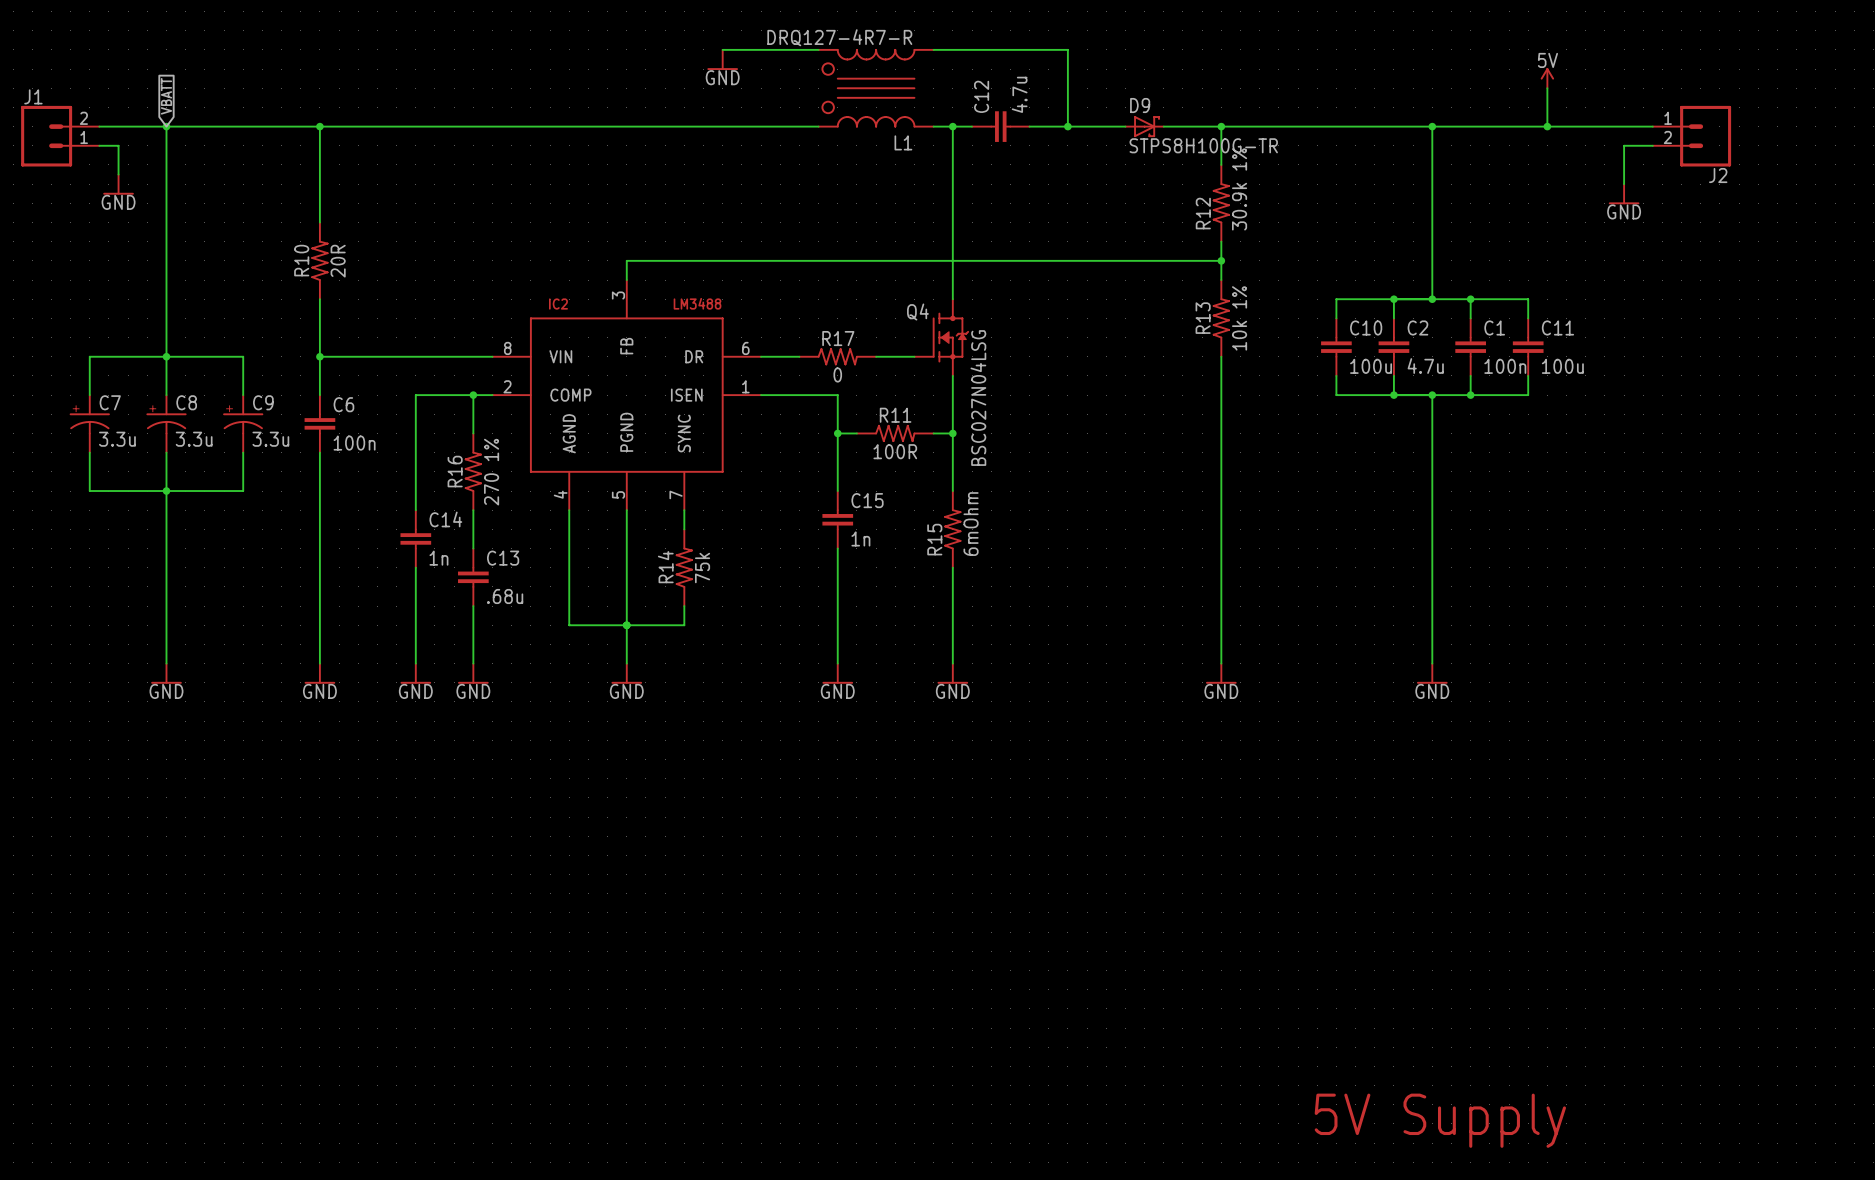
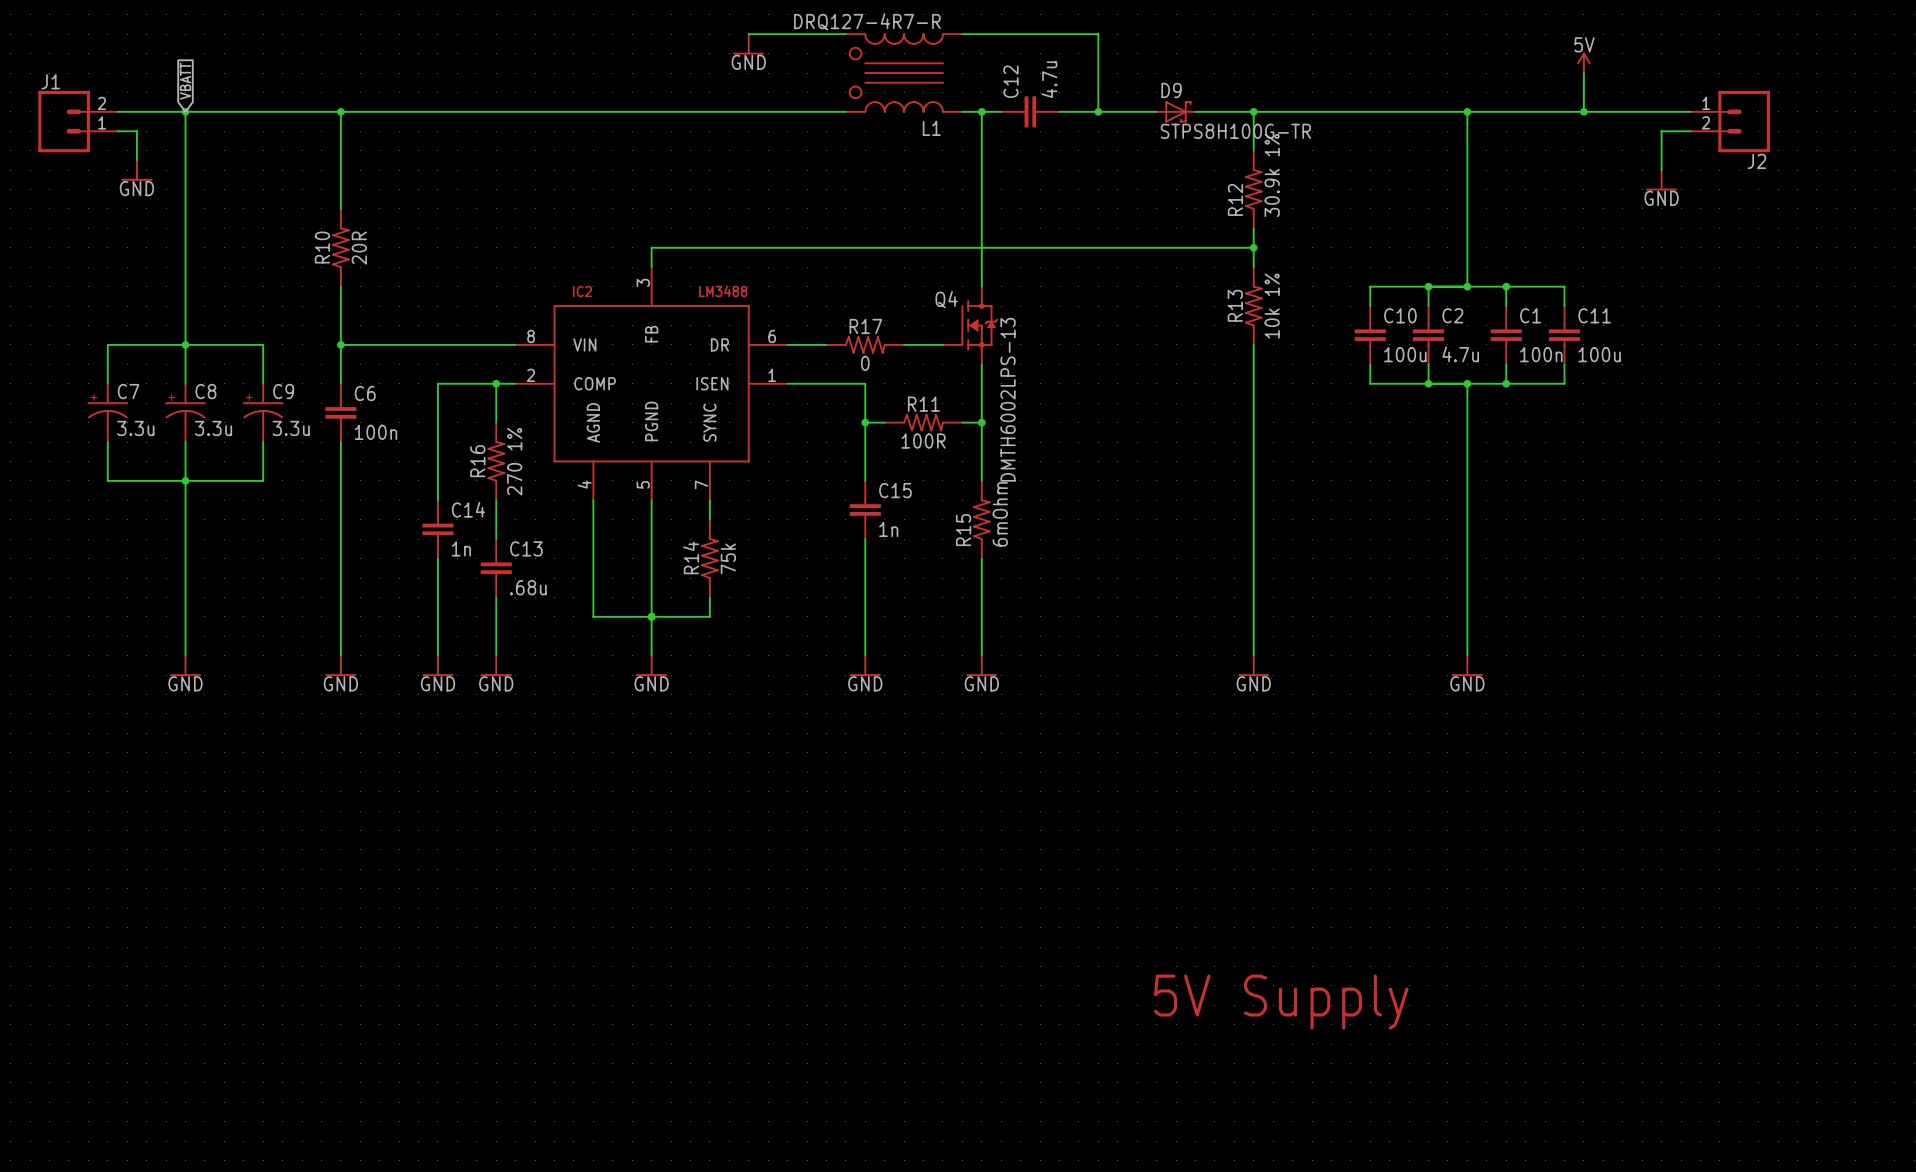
Q4 value: BSC027N04LSG (978, 398) -> DMTH6002LPS-13 (1008, 399)
text: none -> 5V Supply (1281, 1002)
text: 5V Supply (1440, 1120) -> none

